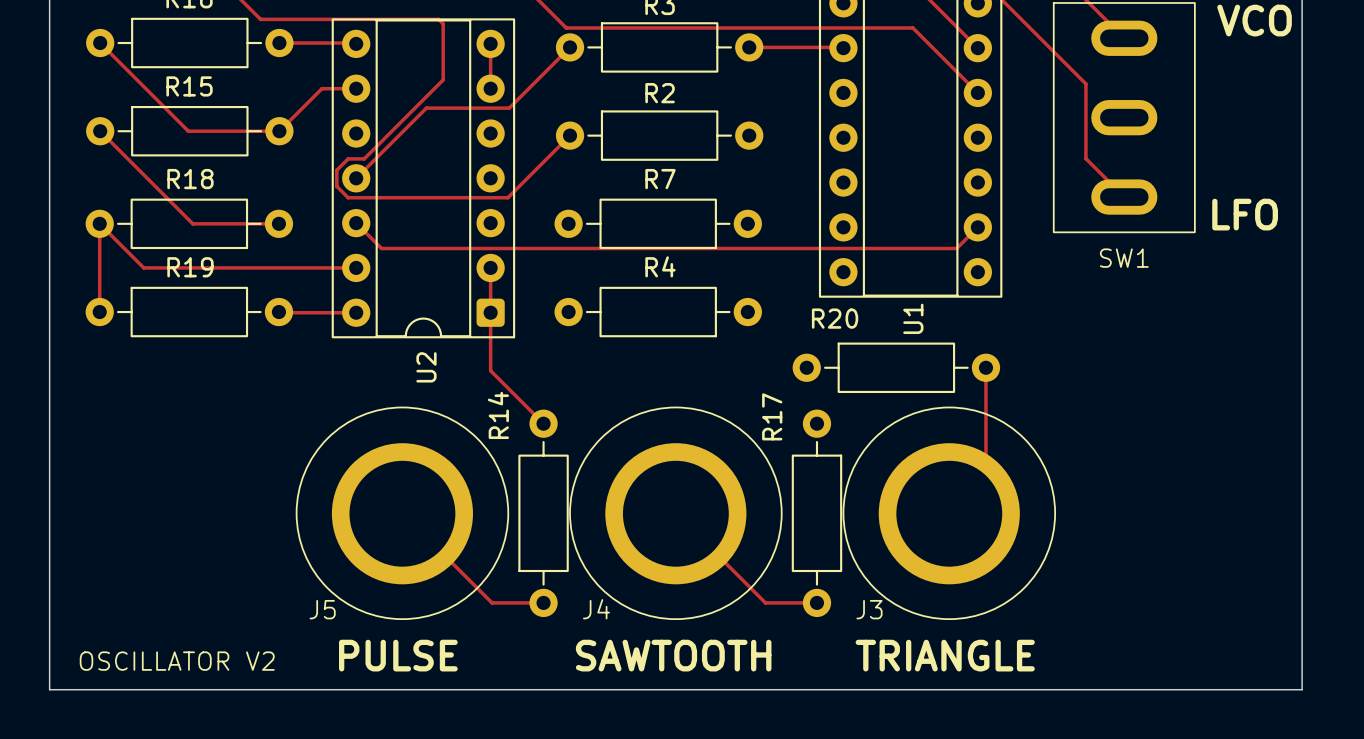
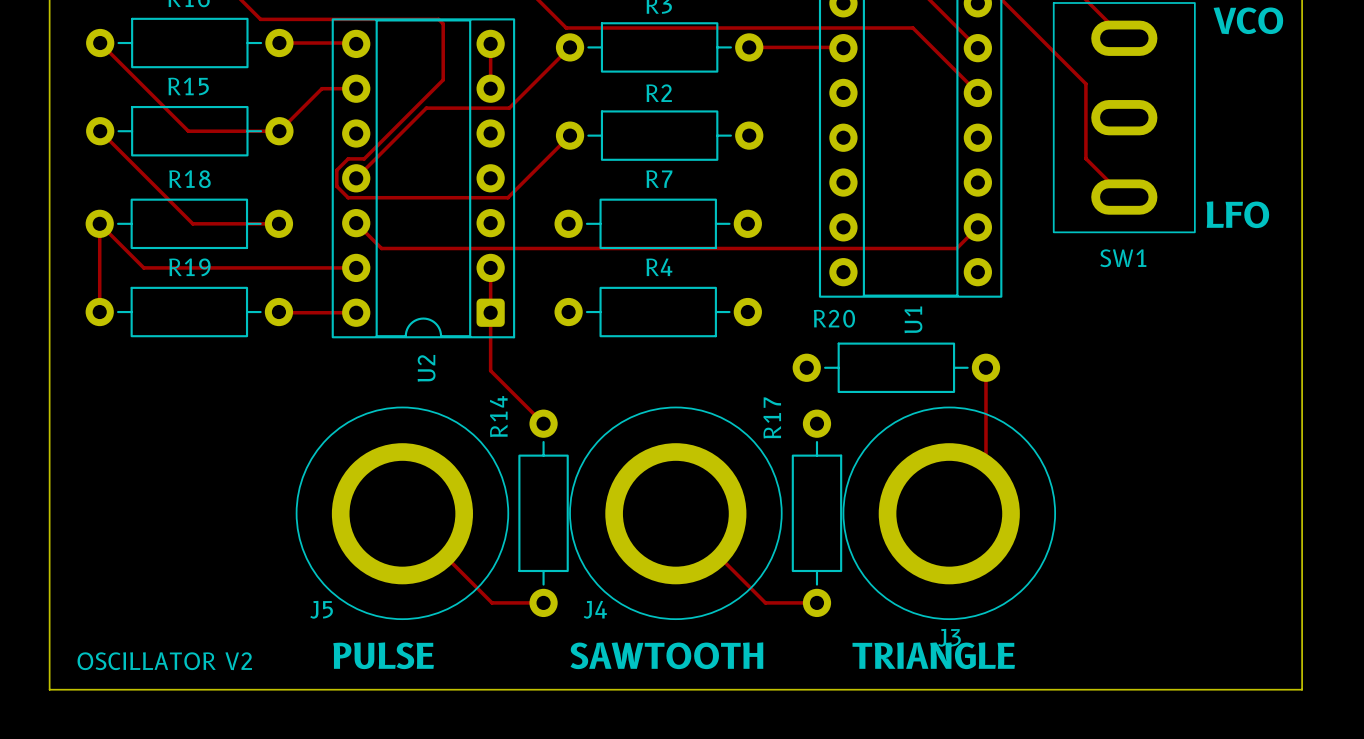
J3 name position: J3 (869, 609) -> J3 (949, 637)

